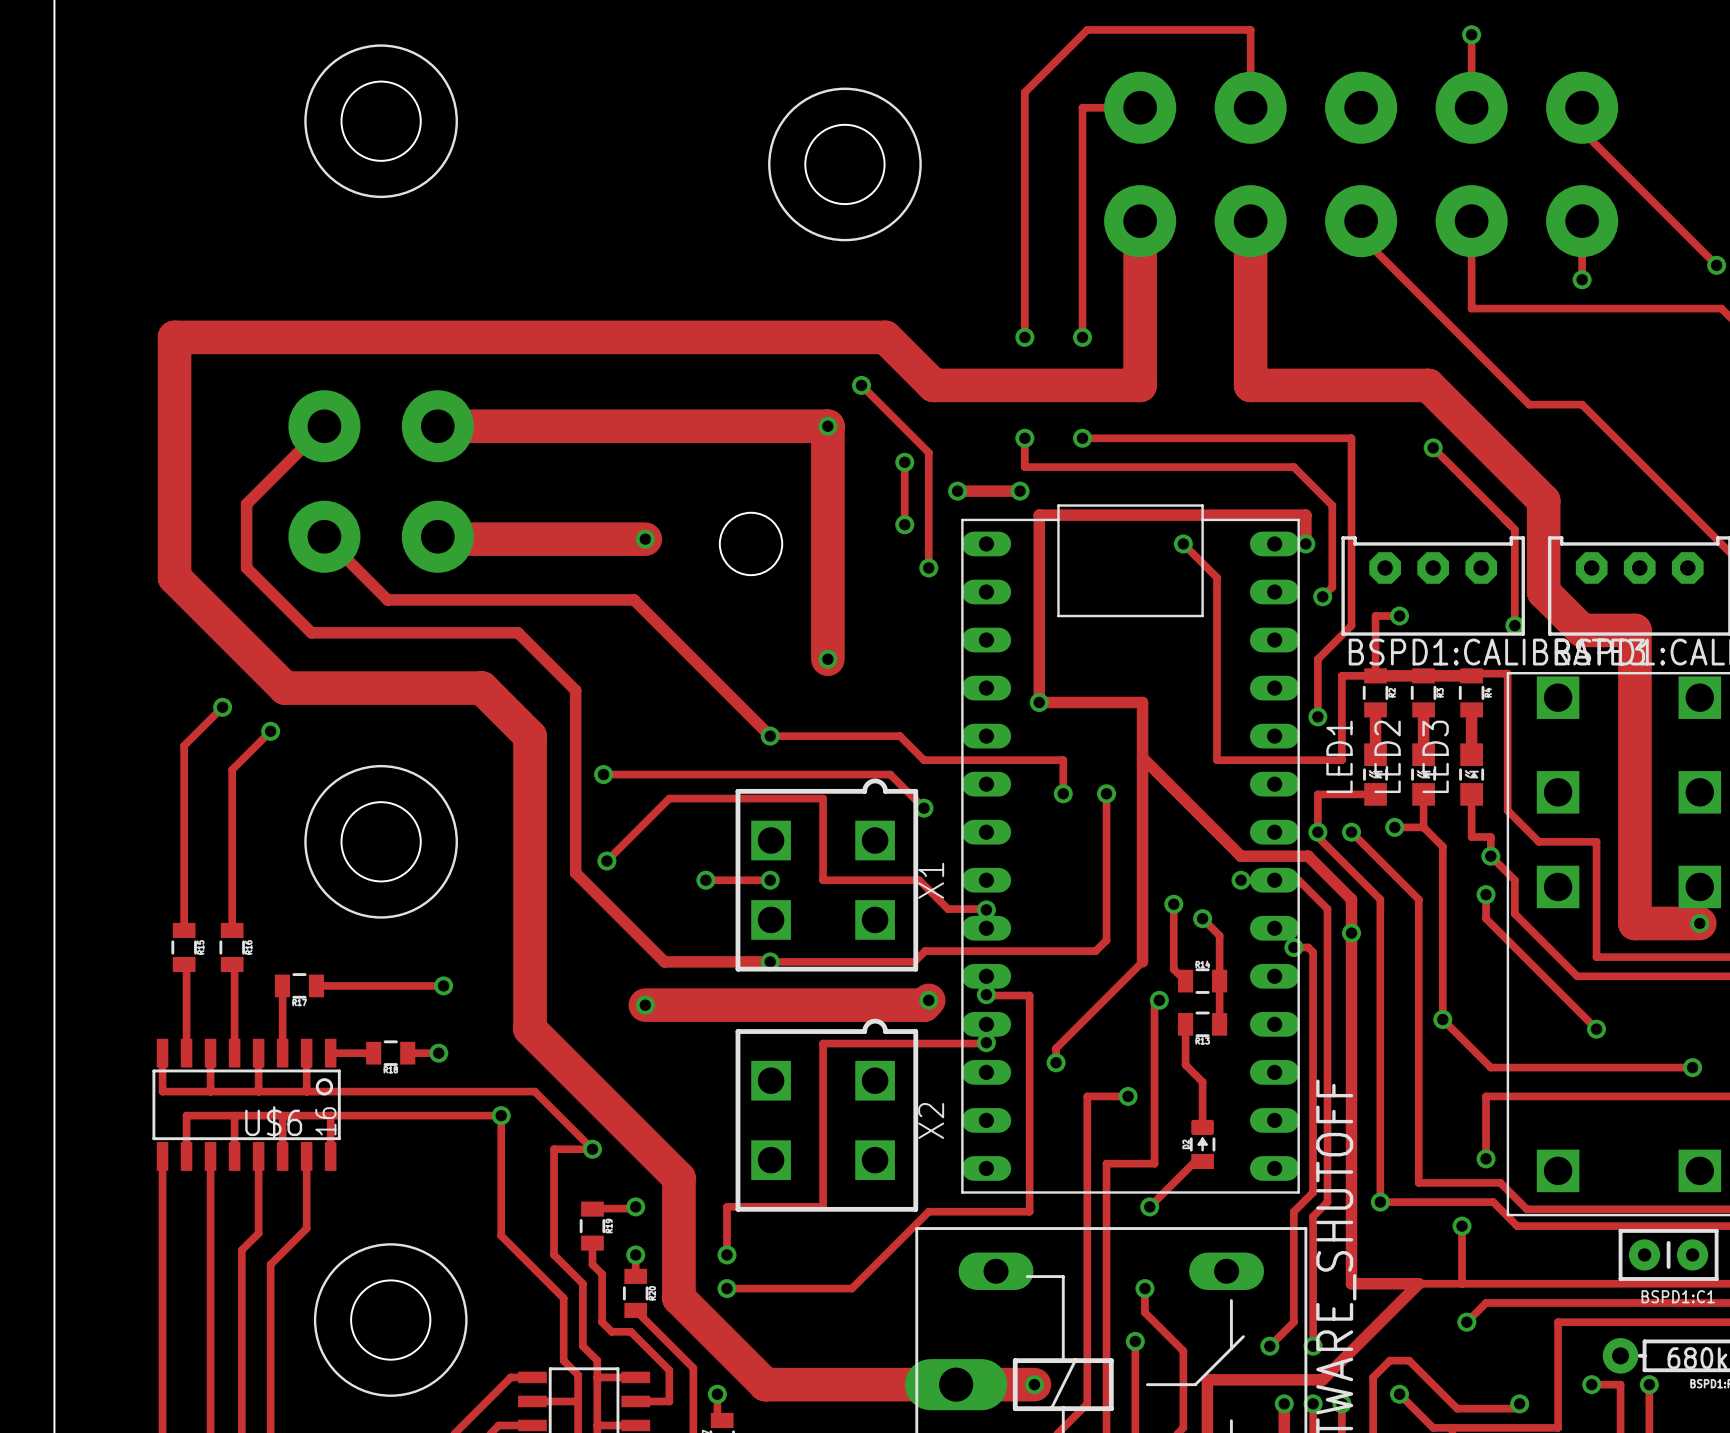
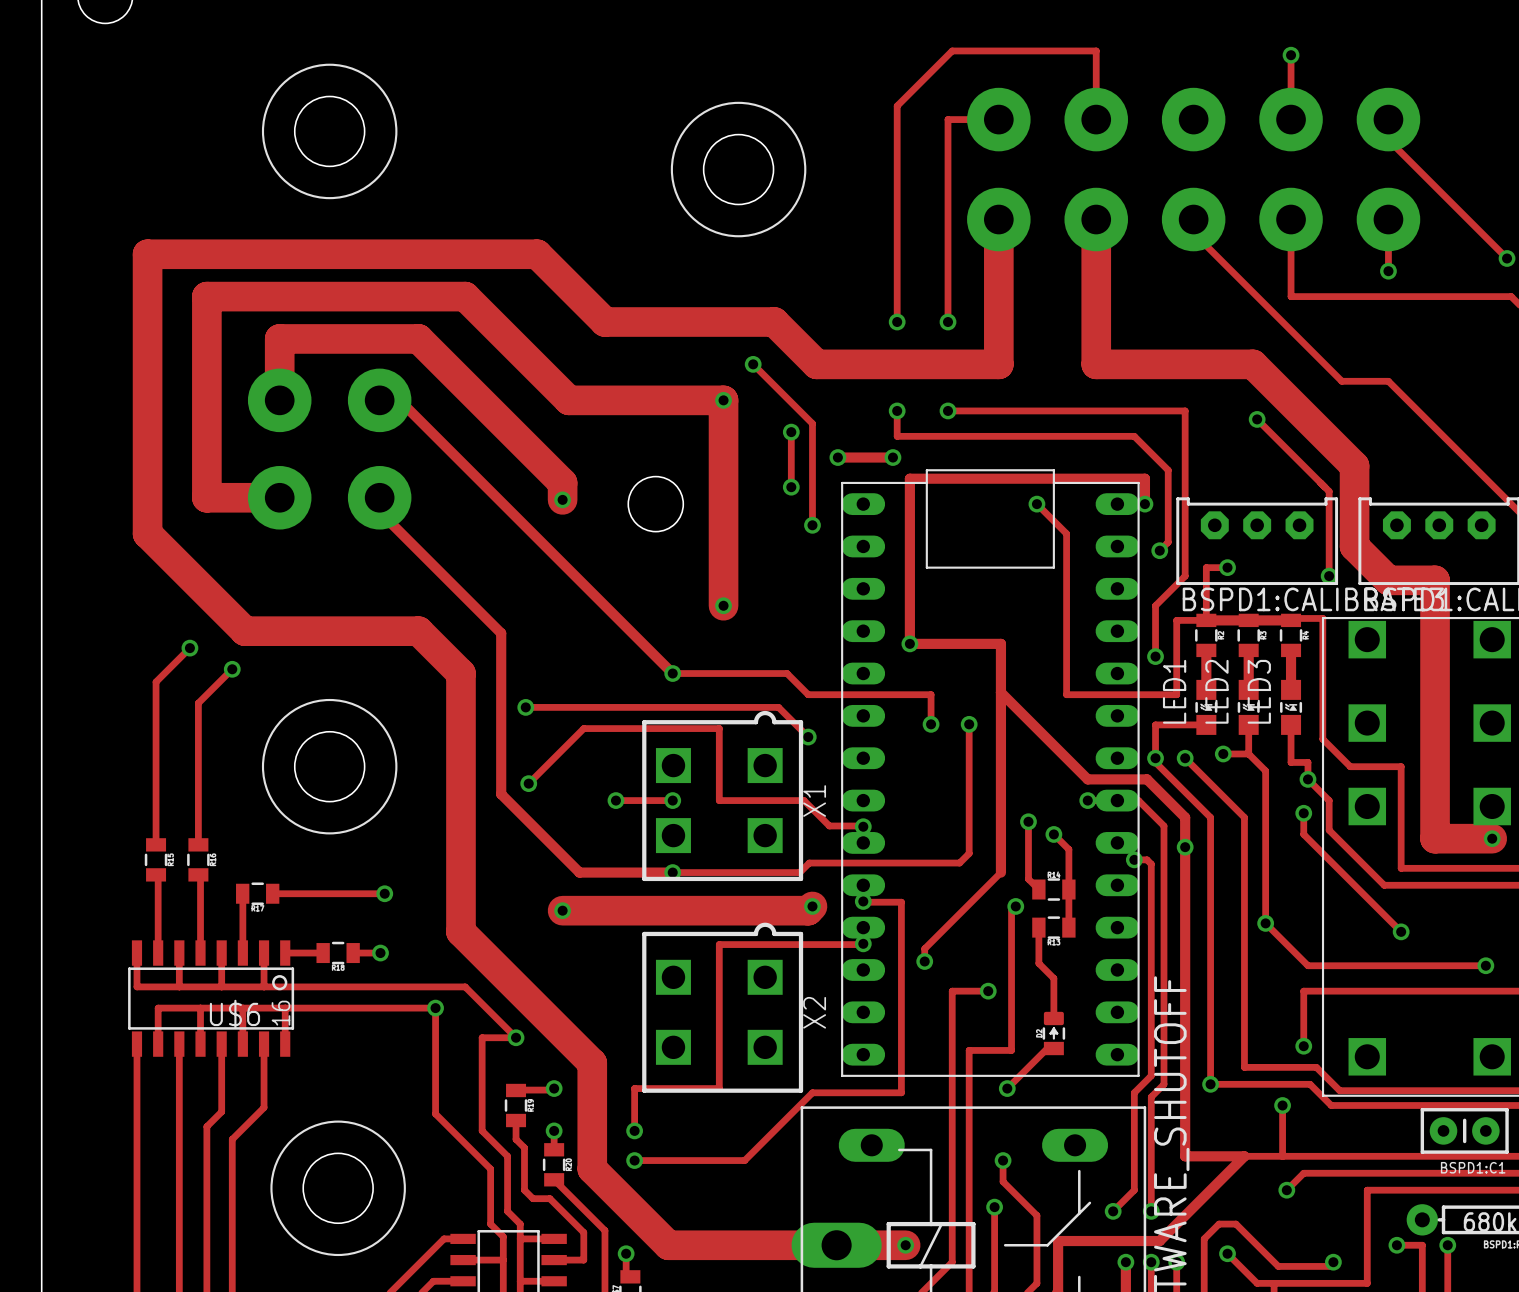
track: (174, 337) (693, 337) -> (147, 322) (147, 254) (537, 254) (604, 322)
track: (324, 426) (246, 504) (246, 567) (311, 632) (518, 632) -> (279, 400) (279, 338) (418, 338) (562, 482) (562, 499)
track: (460, 426) (652, 426) -> (399, 400) (552, 553)
track: (324, 536) (387, 599) (634, 599) -> (279, 497) (206, 497) (206, 296) (465, 296) (568, 400)
track: (437, 536) (440, 539) (645, 539) -> (379, 497) (379, 511) (450, 582)

